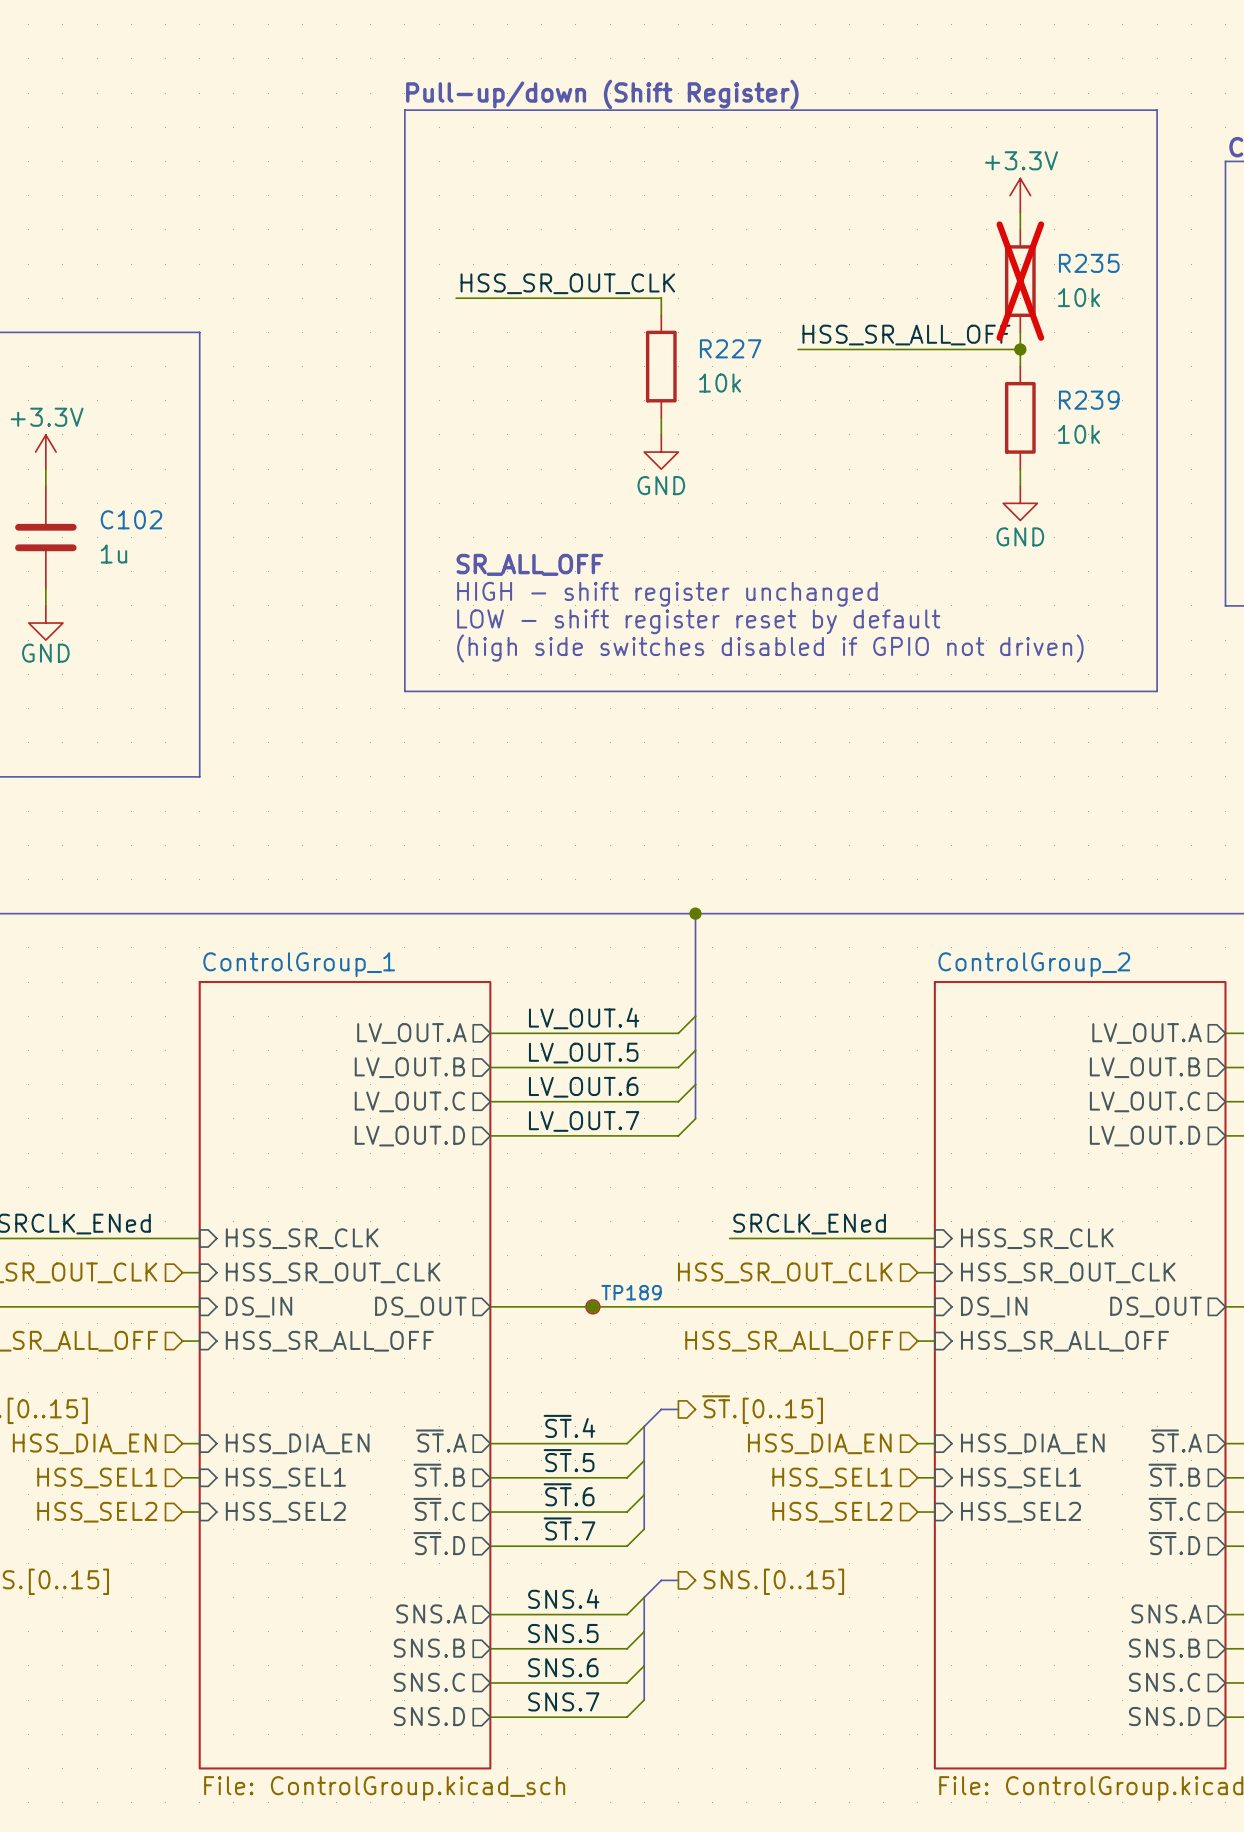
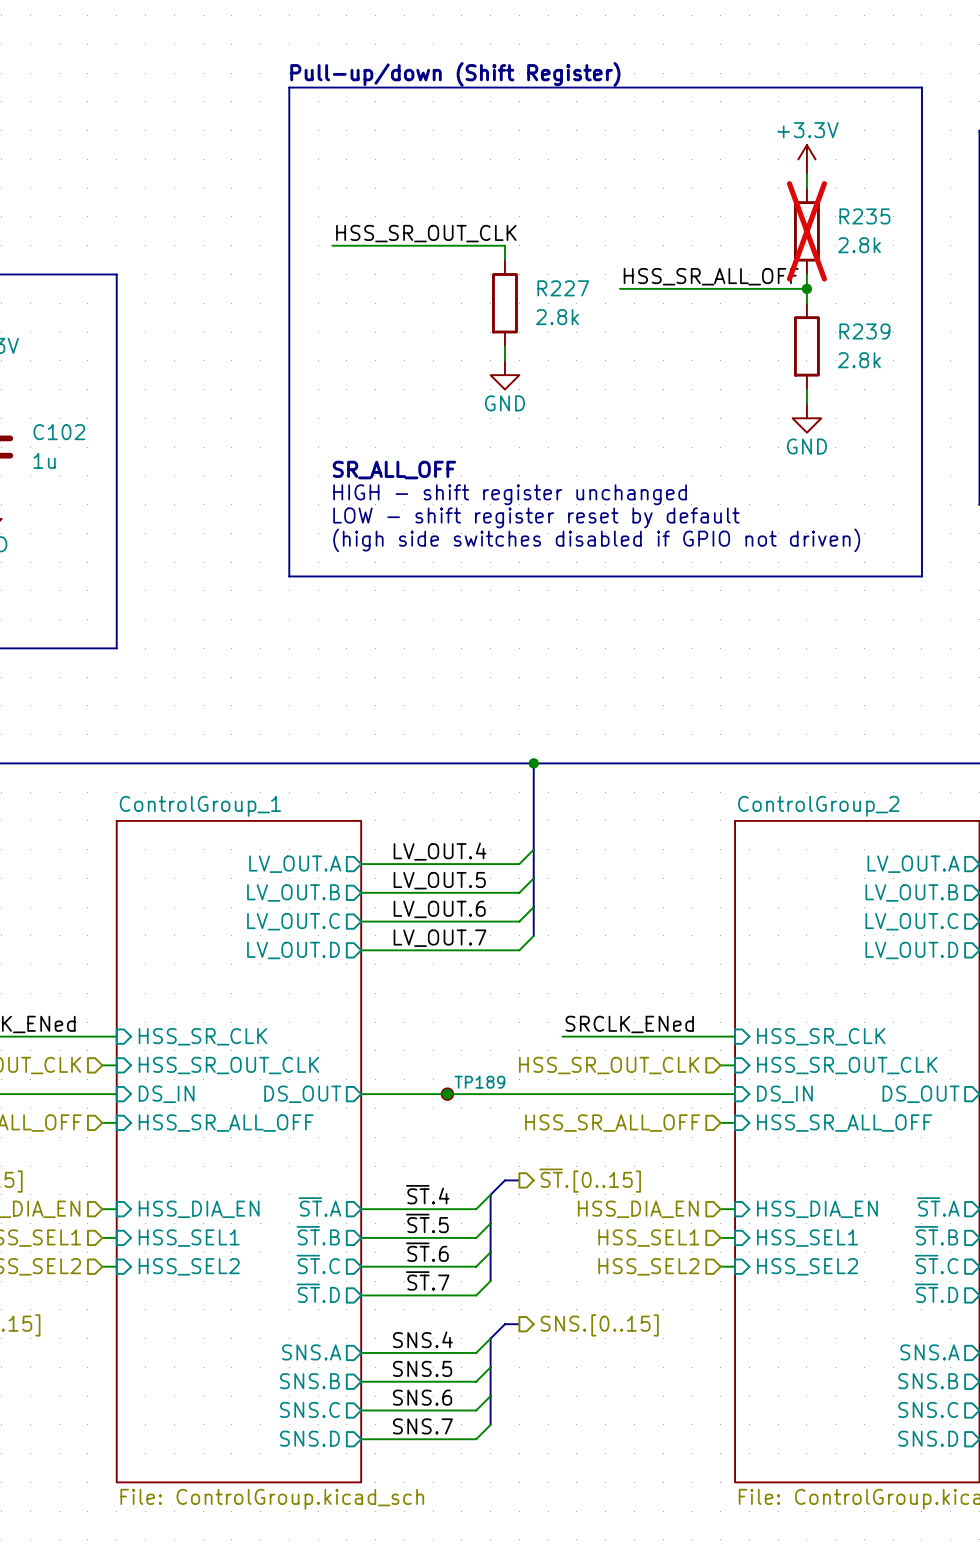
R235 value: 10k (1079, 297) -> 2.8k (859, 245)
R227 value: 10k (720, 383) -> 2.8k (557, 317)
R239 value: 10k (1079, 434) -> 2.8k (859, 360)

